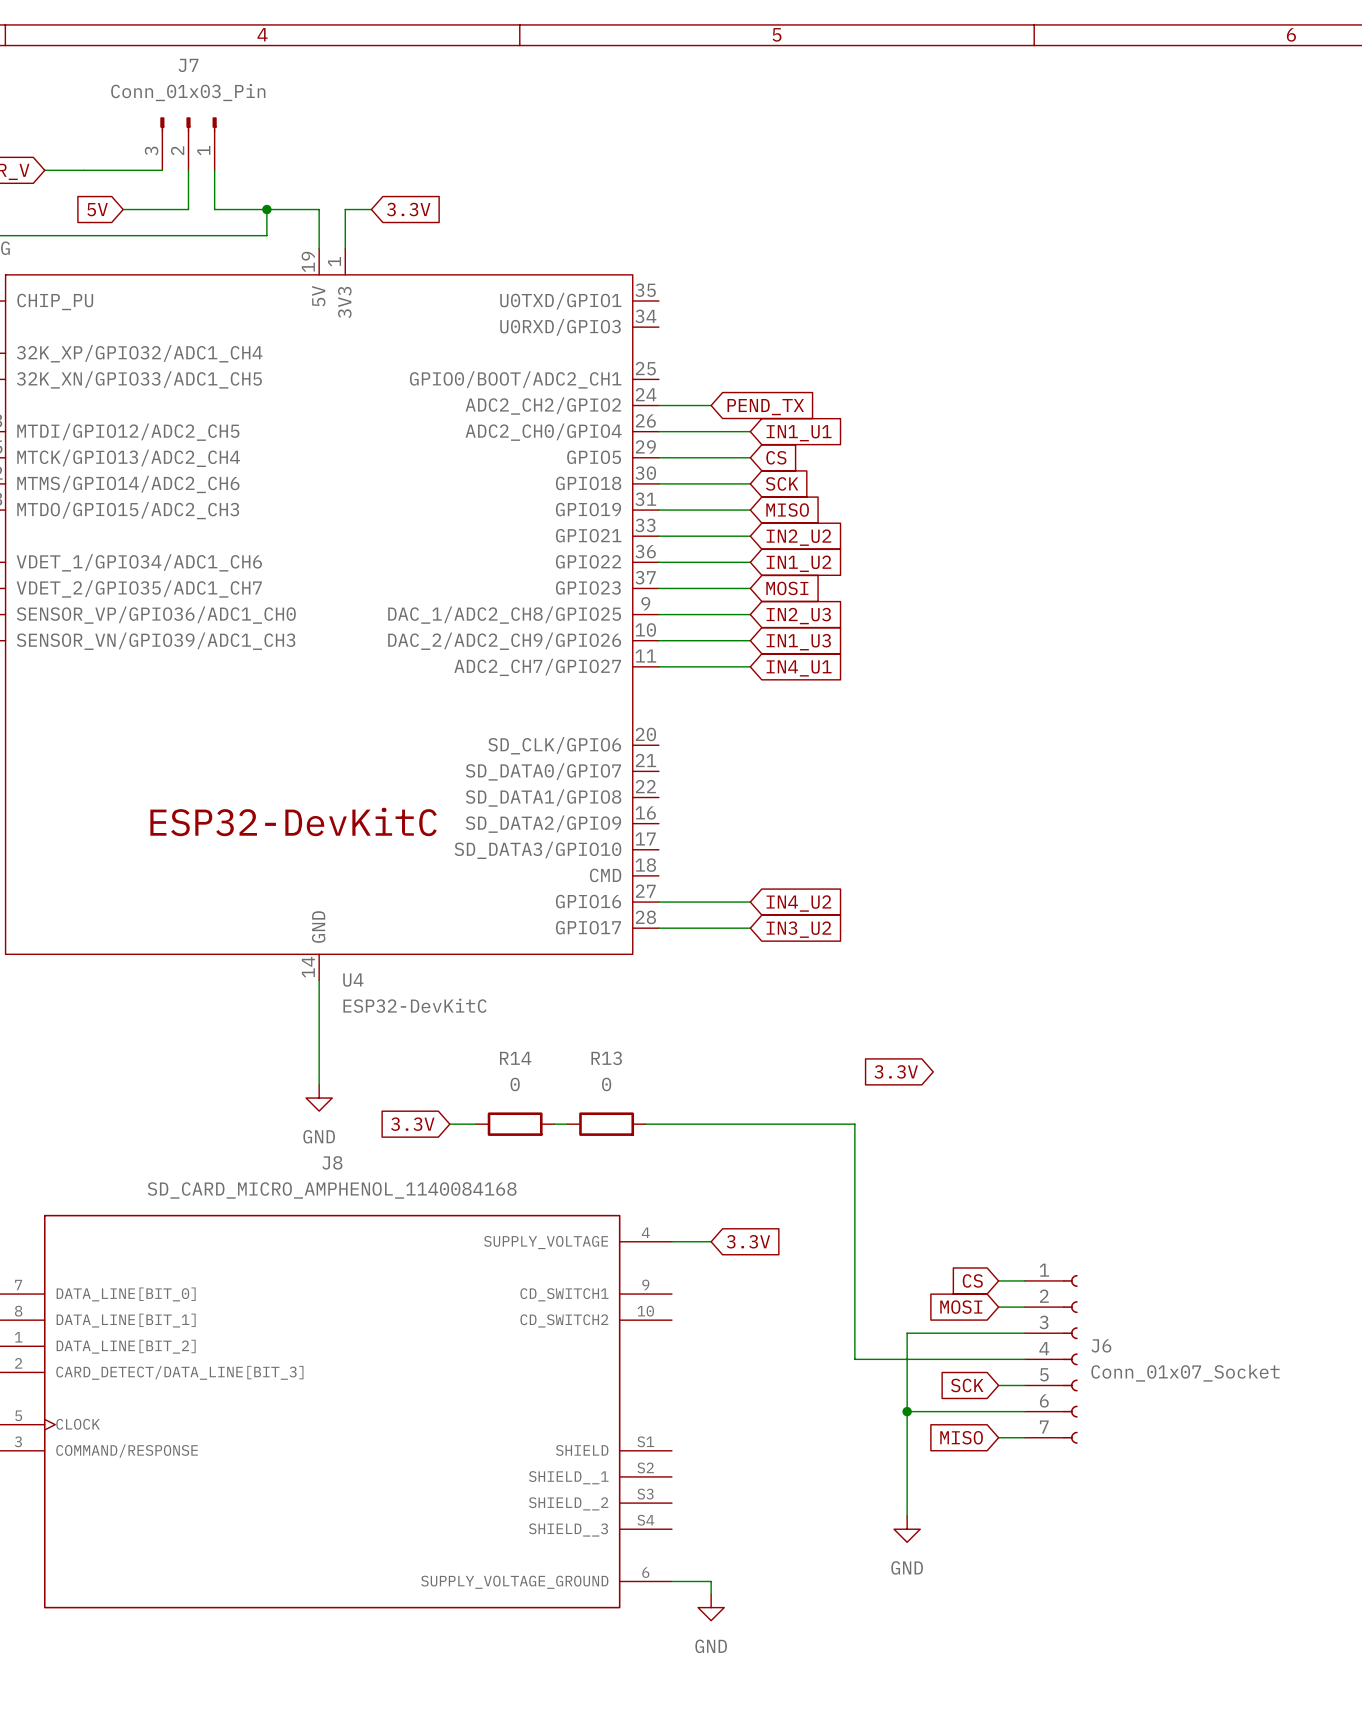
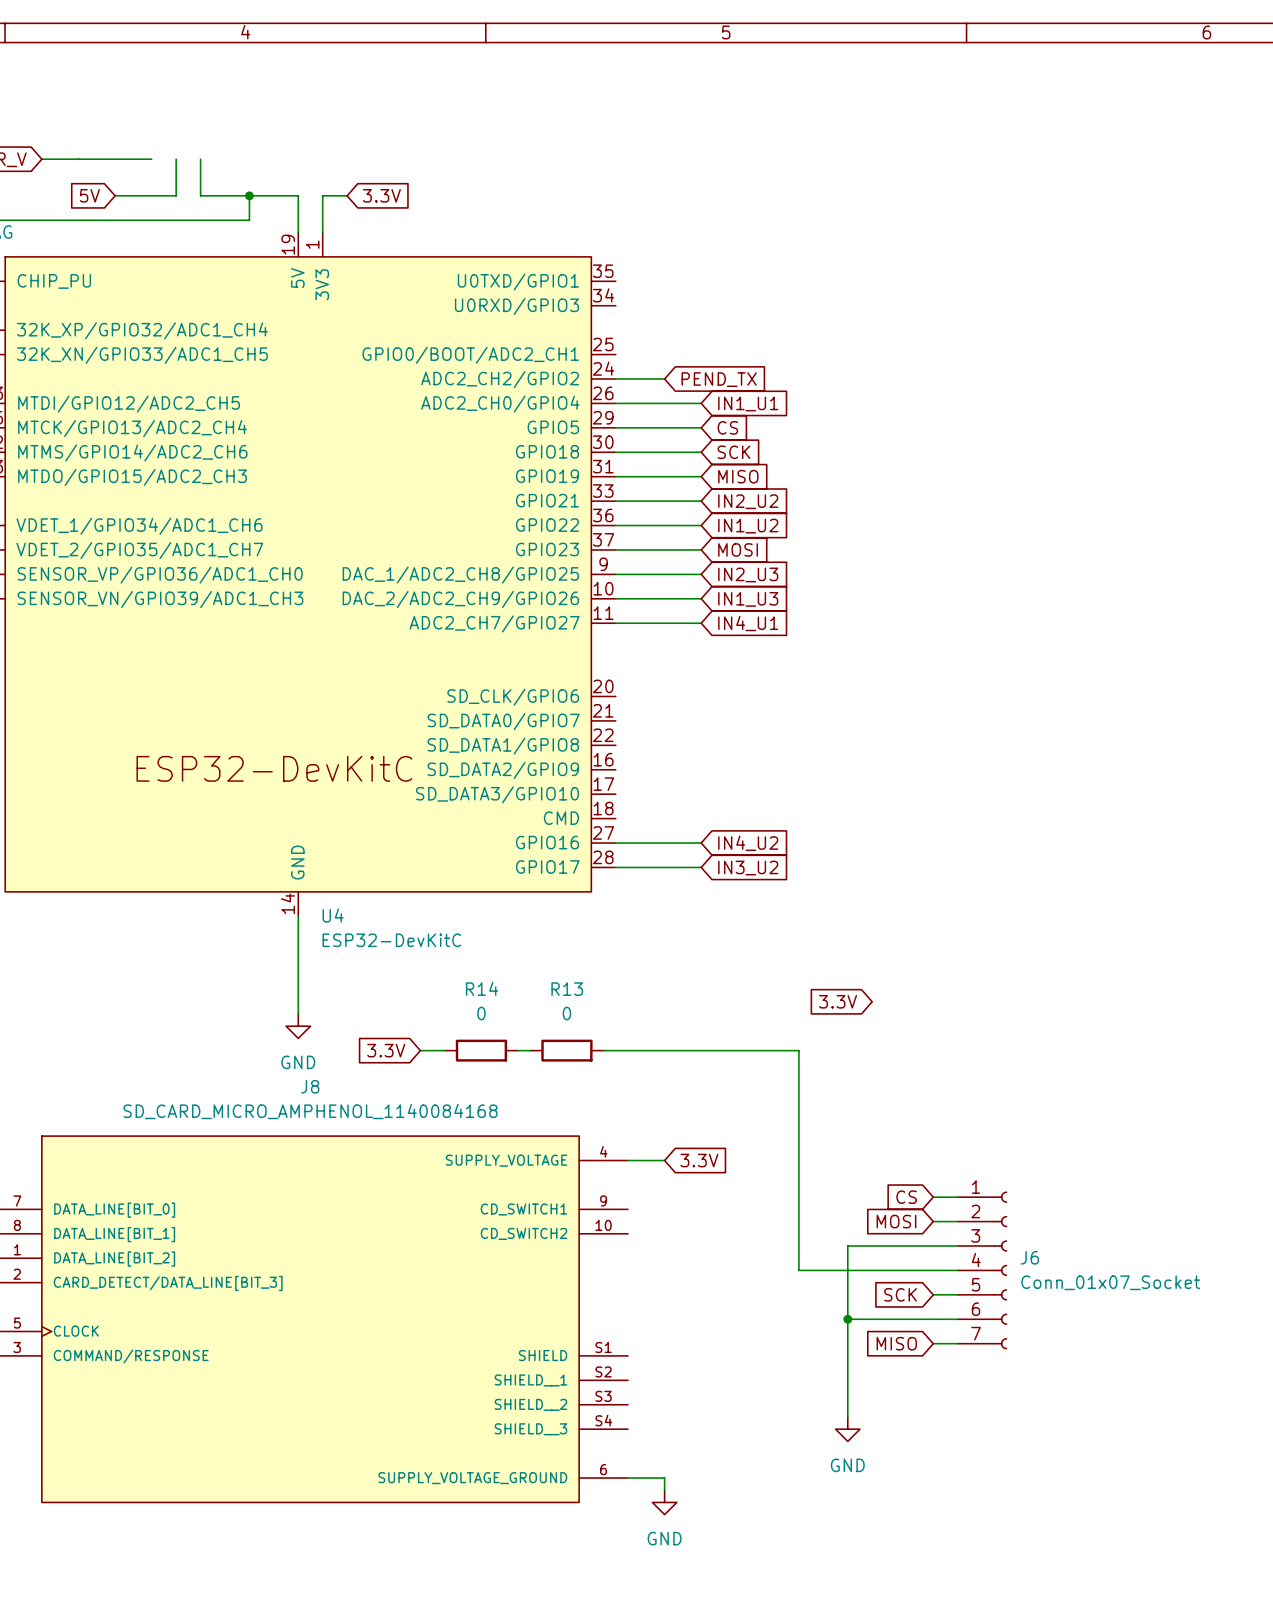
J7: Conn_01x03_Pin (188, 143) -> none

